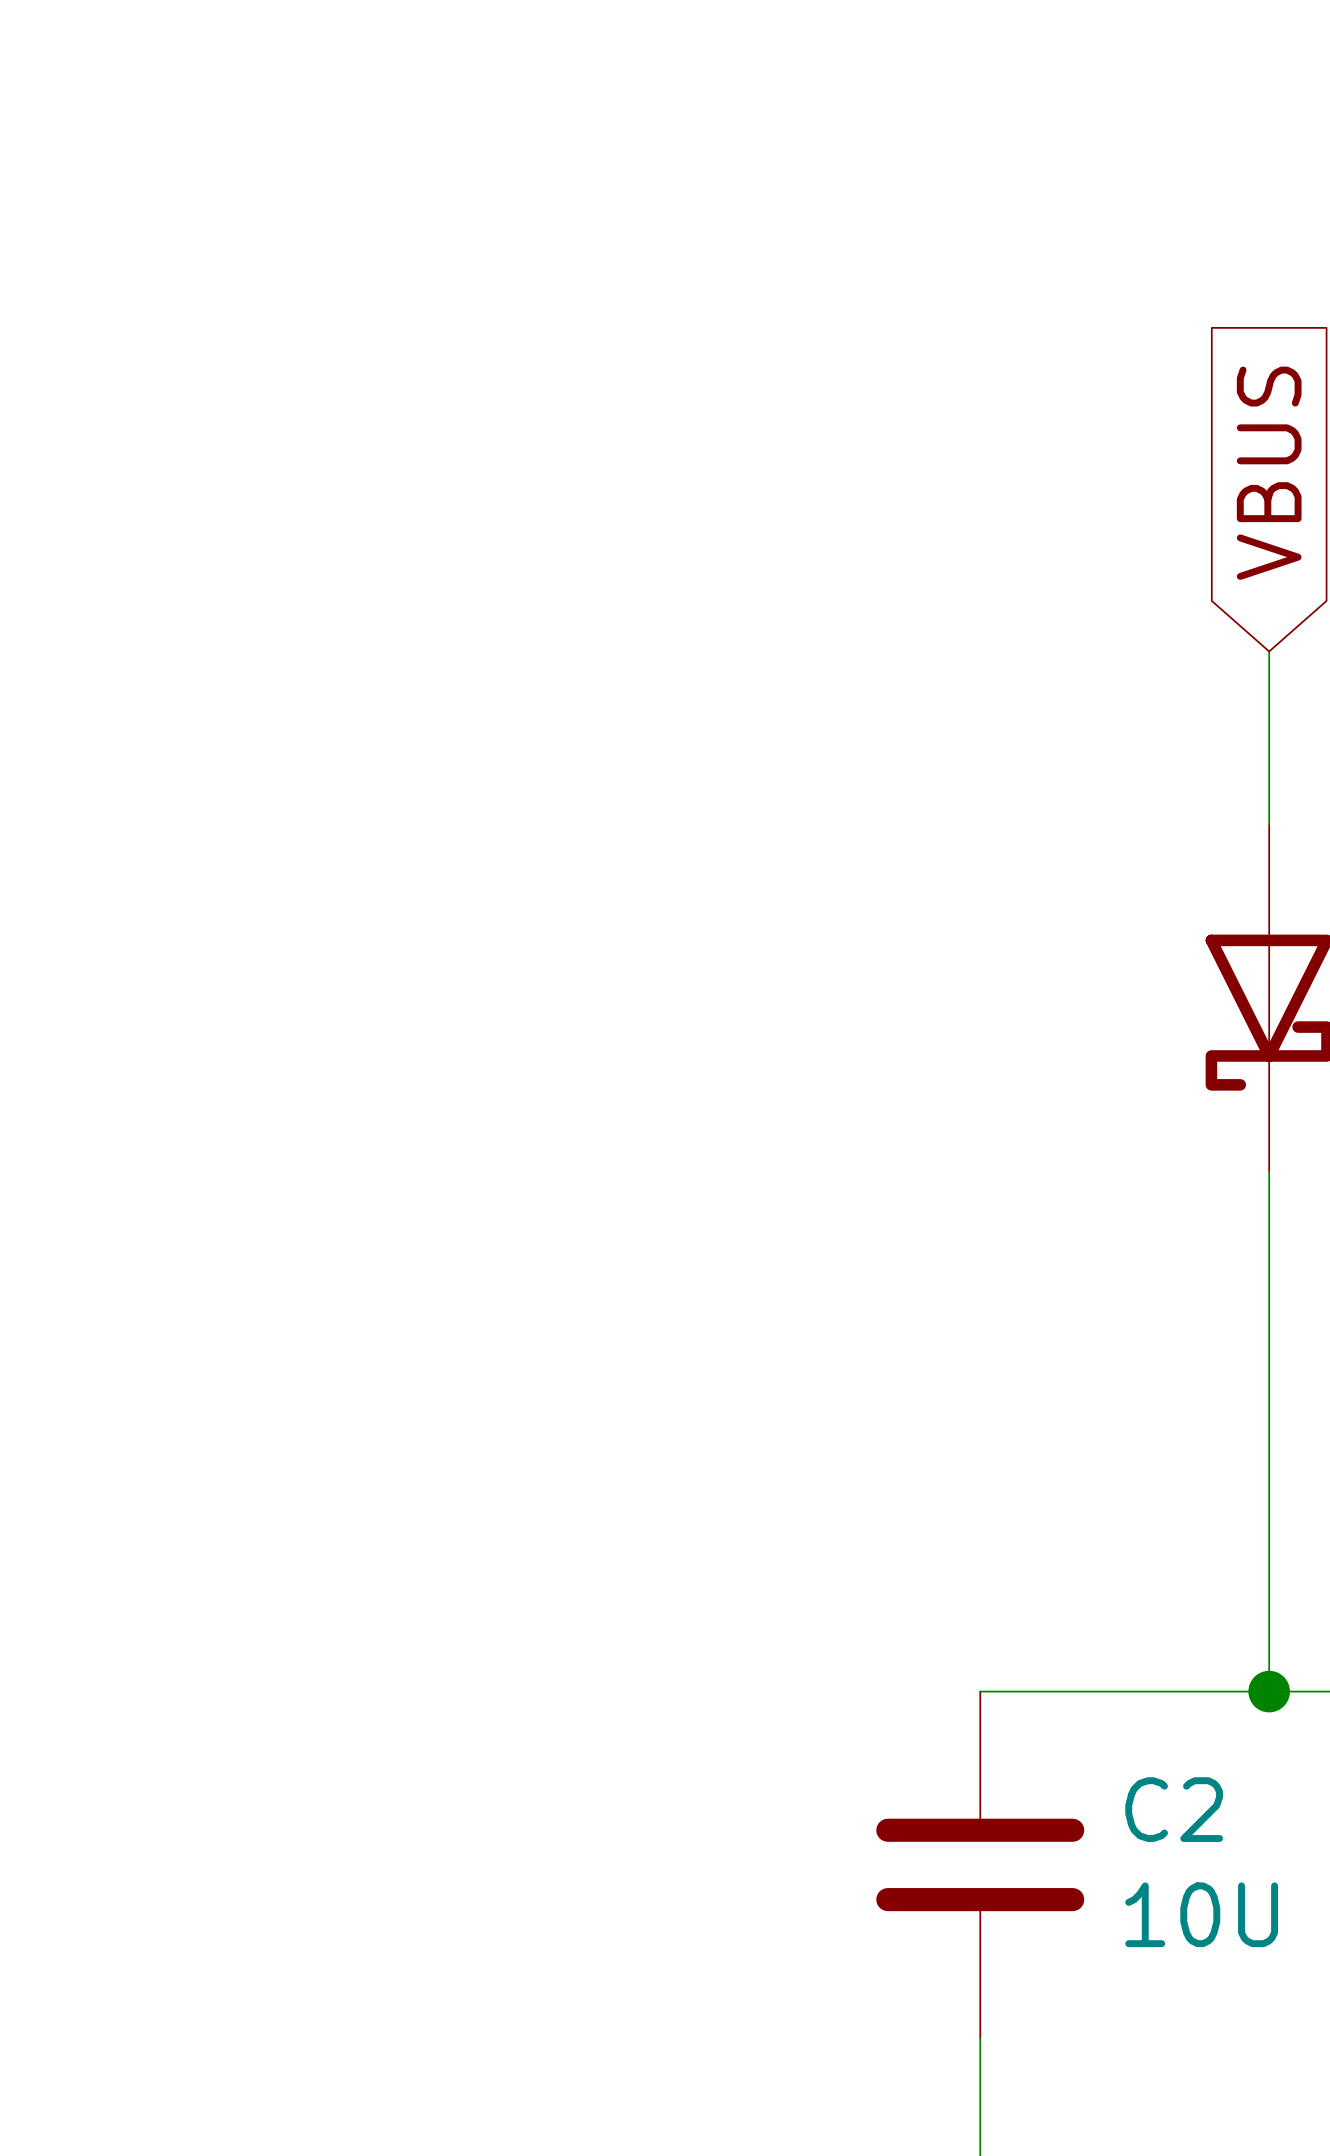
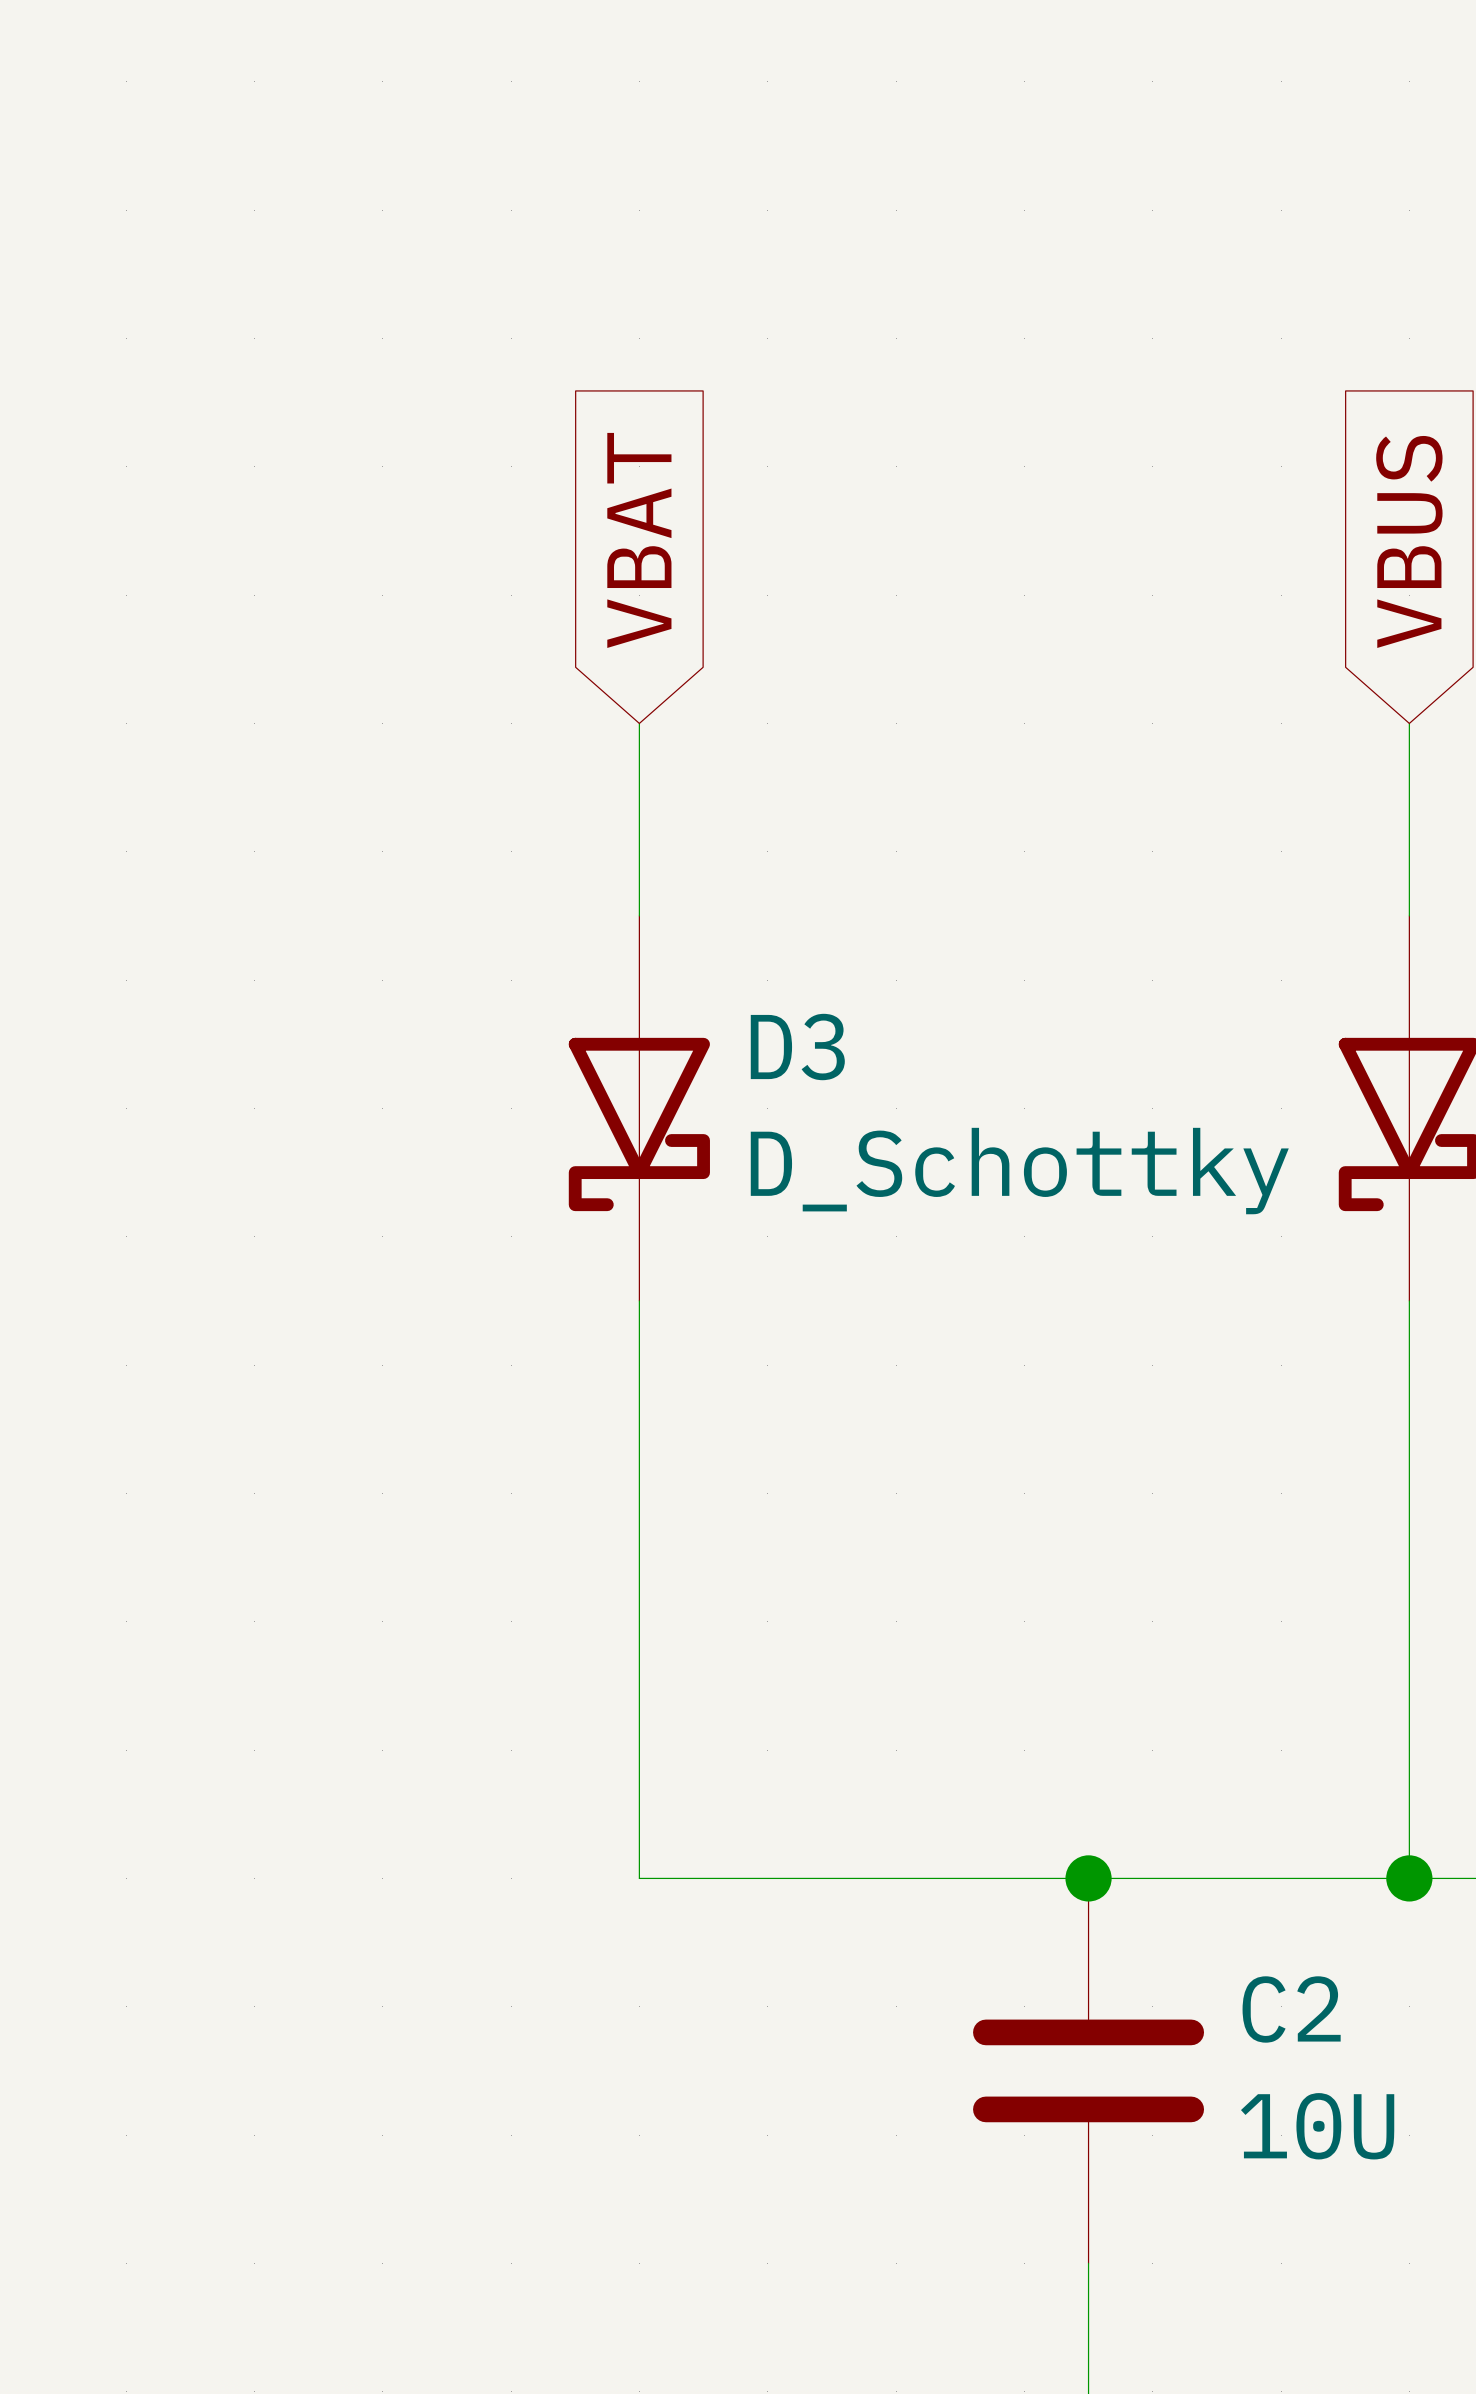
global label: none -> VBAT (639, 540)
wire: none -> (639, 723) (639, 915)
D3: none -> D_Schottky (639, 1108)
wire: none -> (639, 1300) (639, 1878) (1088, 1878)
junction: none -> (1088, 1878)

